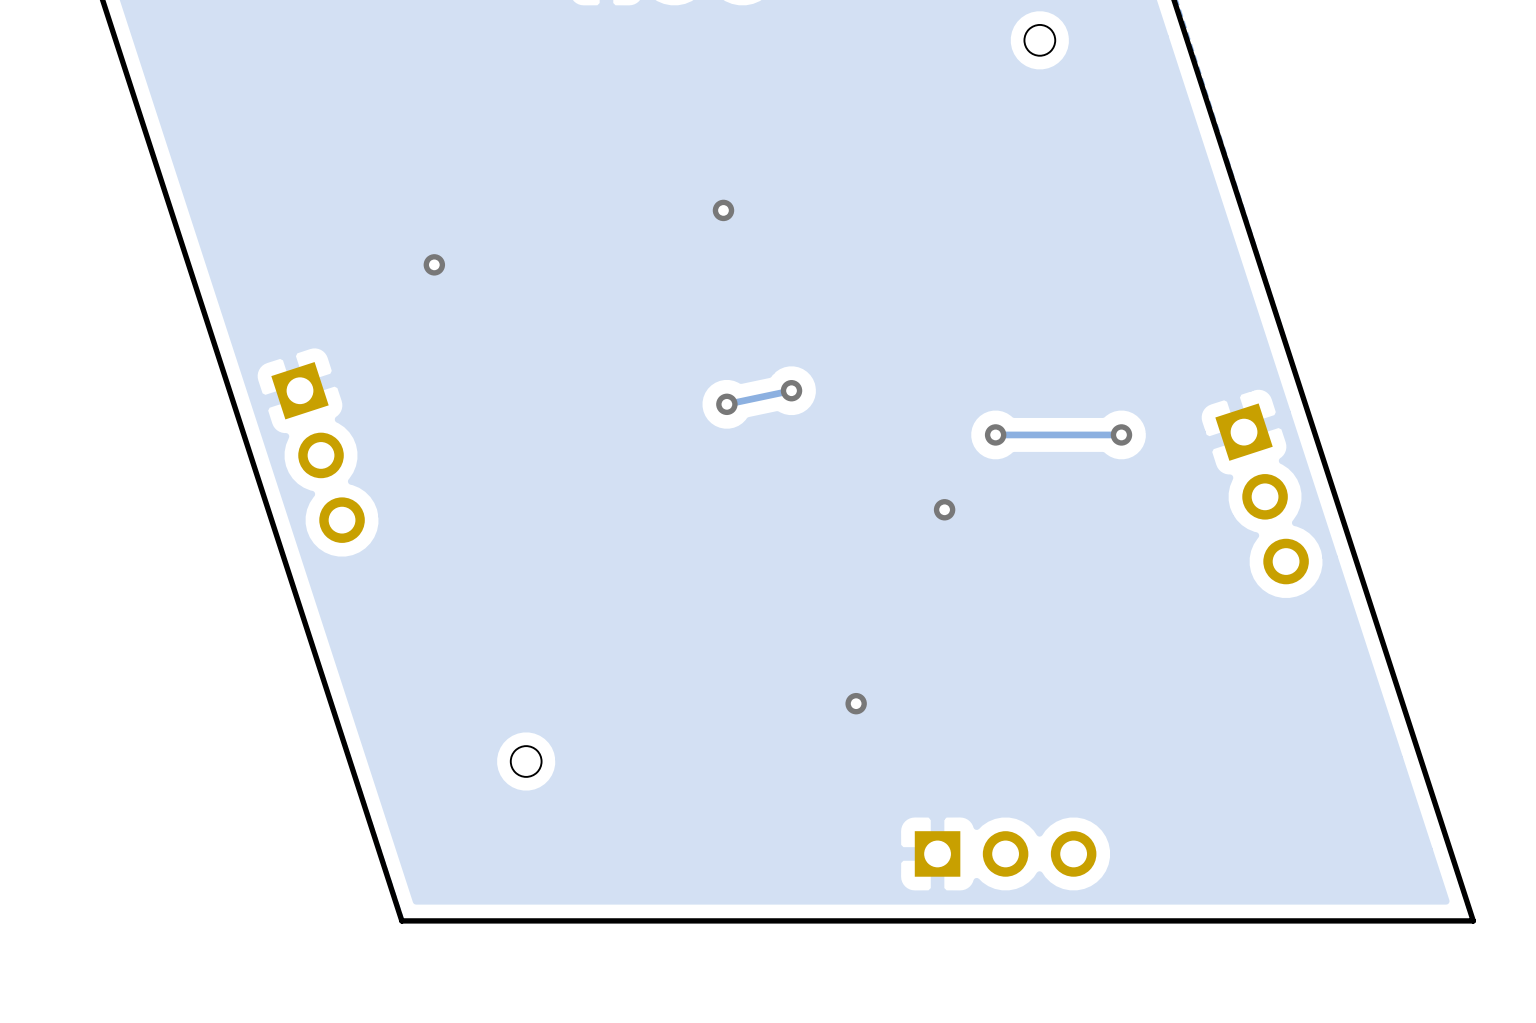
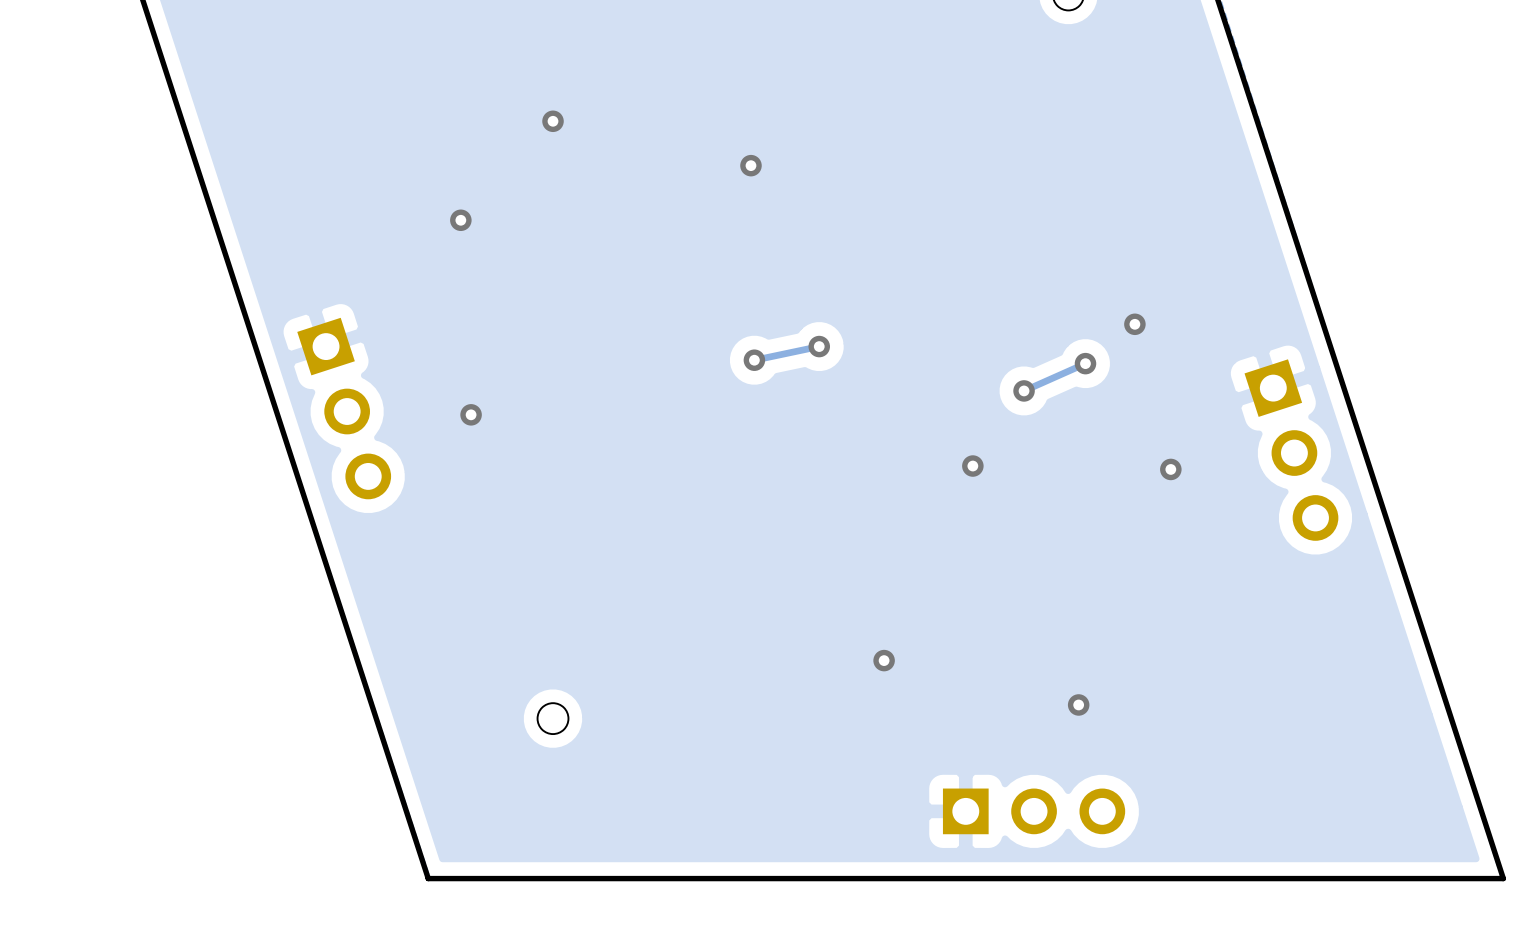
via: none -> (553, 121)
via: none -> (1134, 324)
via: none -> (1085, 363)
track: (1121, 434) (995, 434) -> (1085, 363) (1024, 390)
via: (1121, 434) -> none
via: none -> (471, 414)
via: none -> (1170, 469)
via: none -> (1078, 704)

